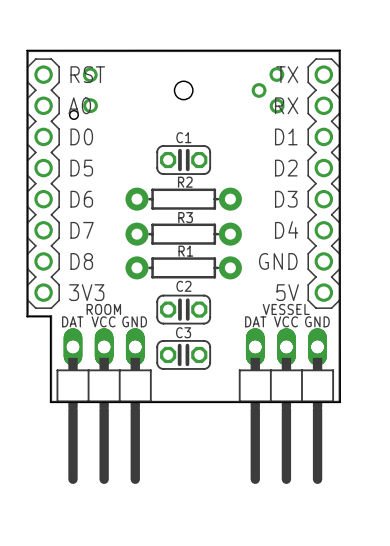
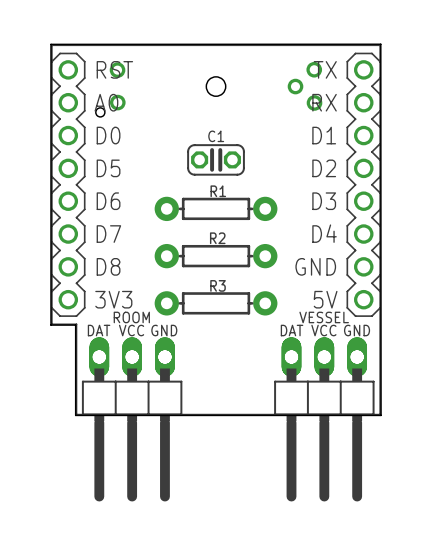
R2 position: (183, 199) -> (216, 256)
R3 position: (183, 234) -> (216, 303)
R1 position: (183, 267) -> (216, 208)
C2: (183, 309) -> none
C3: (183, 354) -> none

